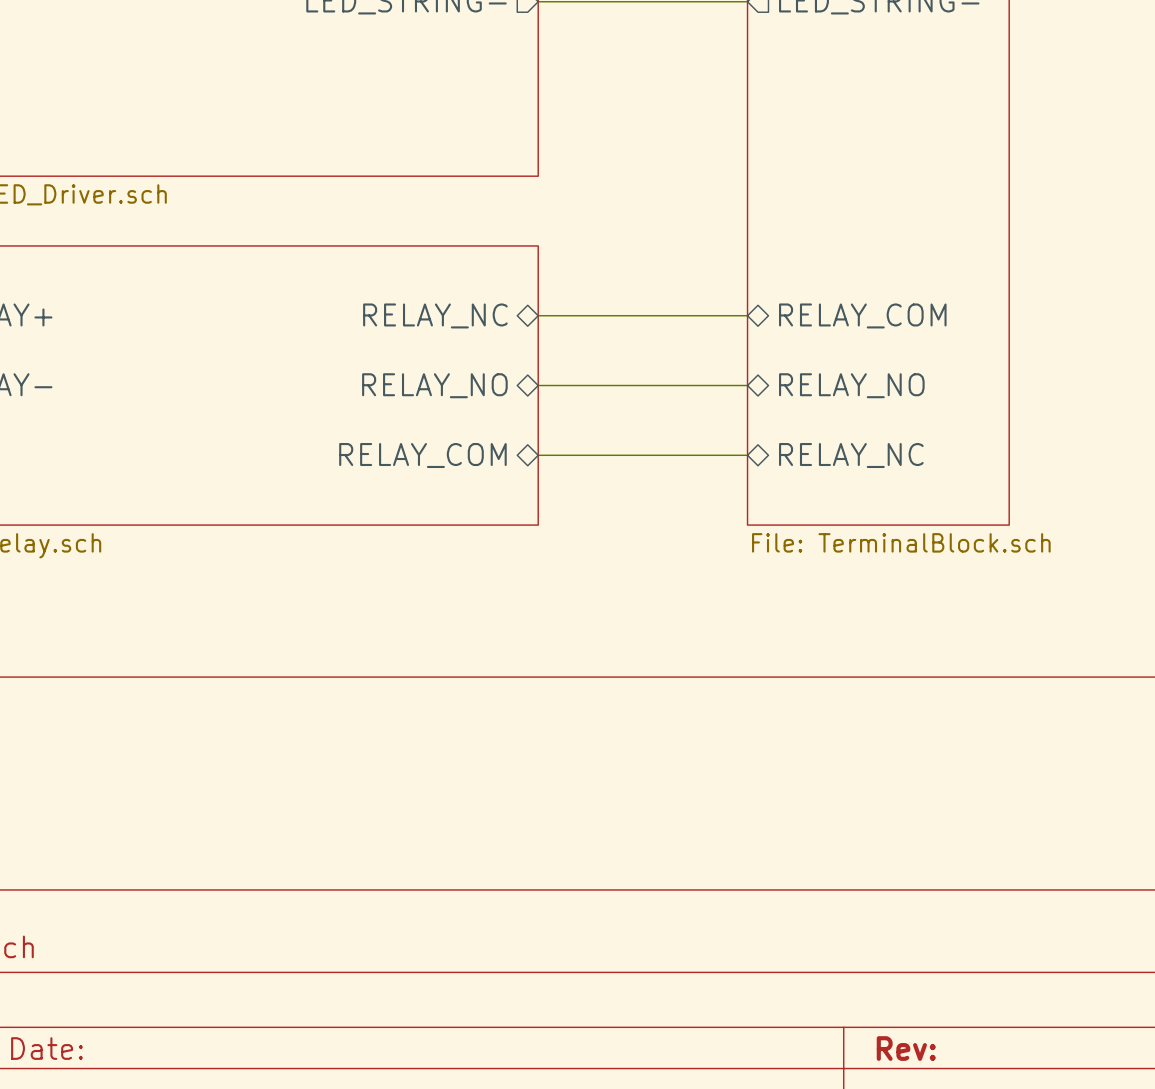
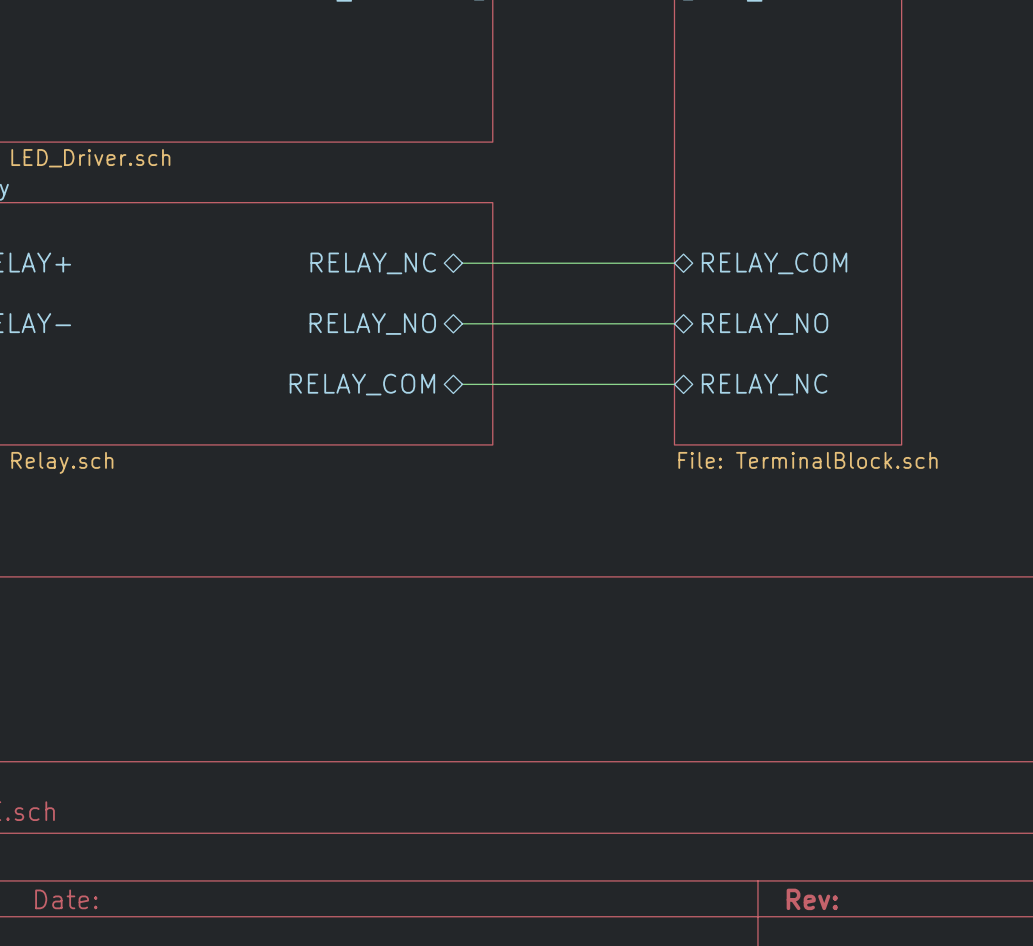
sheet pin position: RELAY_NC (435, 315) -> RELAY_NC (373, 263)
wire: none -> (462, 263) (492, 263)
sheet pin position: RELAY_NO (434, 385) -> RELAY_NO (372, 323)
wire: none -> (462, 323) (492, 323)
sheet pin position: RELAY_COM (422, 455) -> RELAY_COM (362, 384)
wire: none -> (462, 384) (492, 384)

